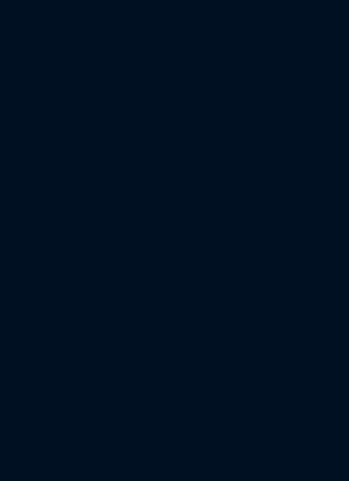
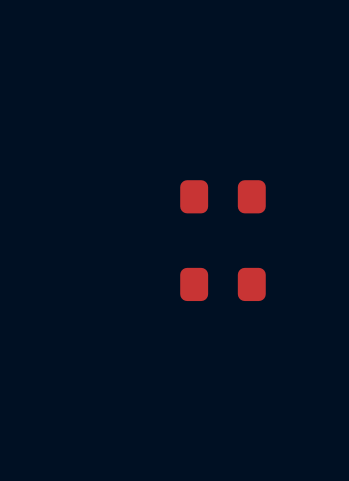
part: none -> (222, 196)
part: none -> (222, 284)

